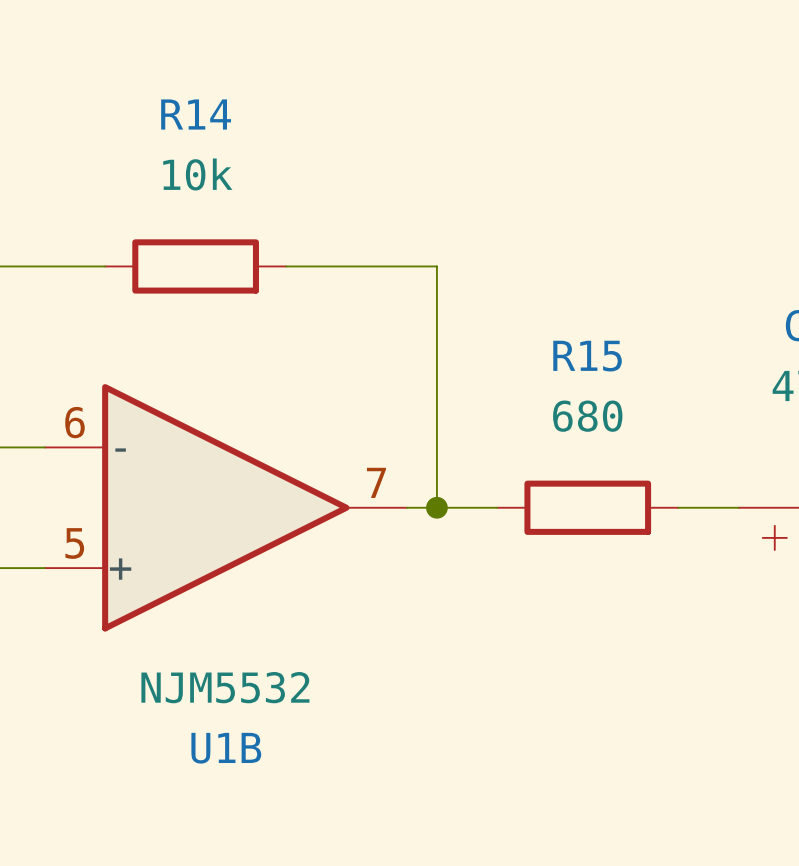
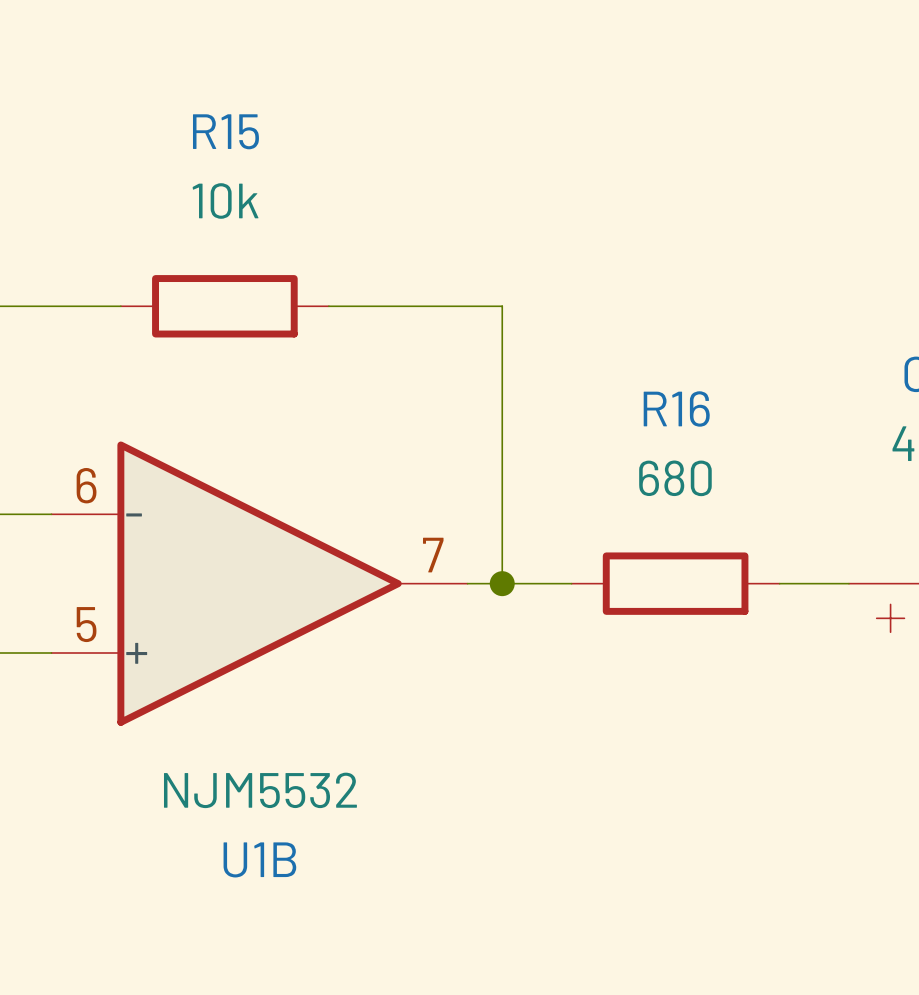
R14 name: R14 (196, 114) -> R15 (225, 131)
R15 name: R15 (587, 356) -> R16 (676, 408)

